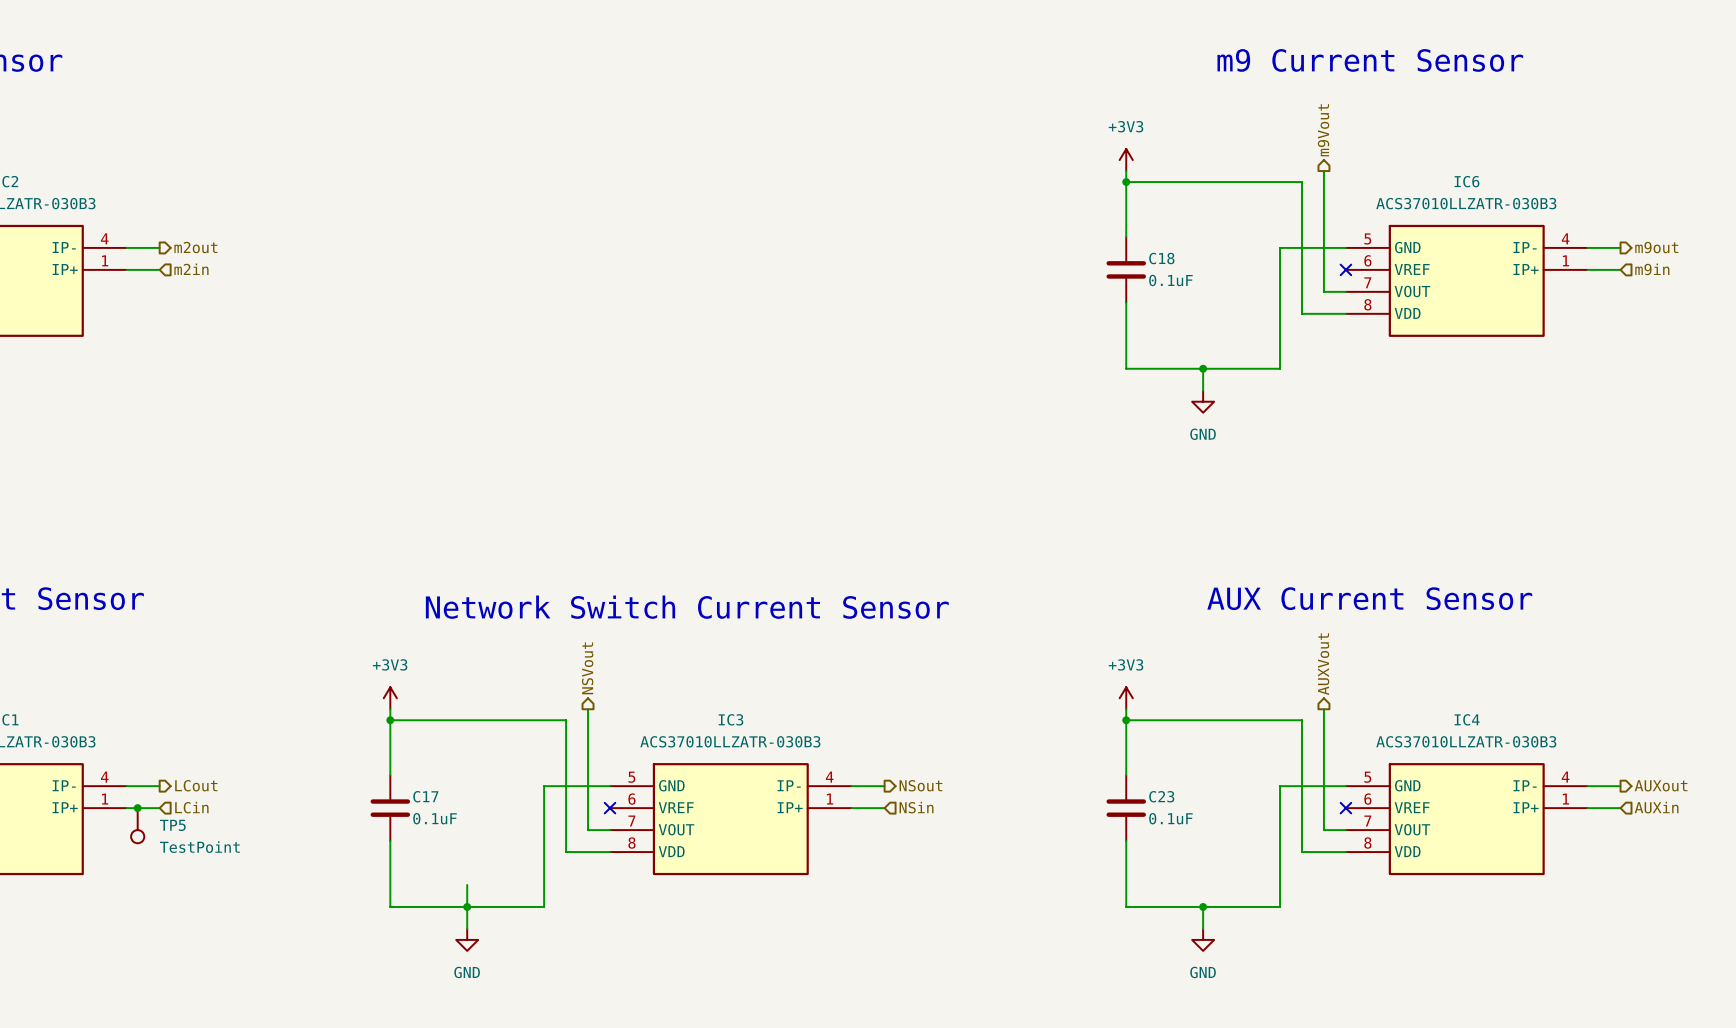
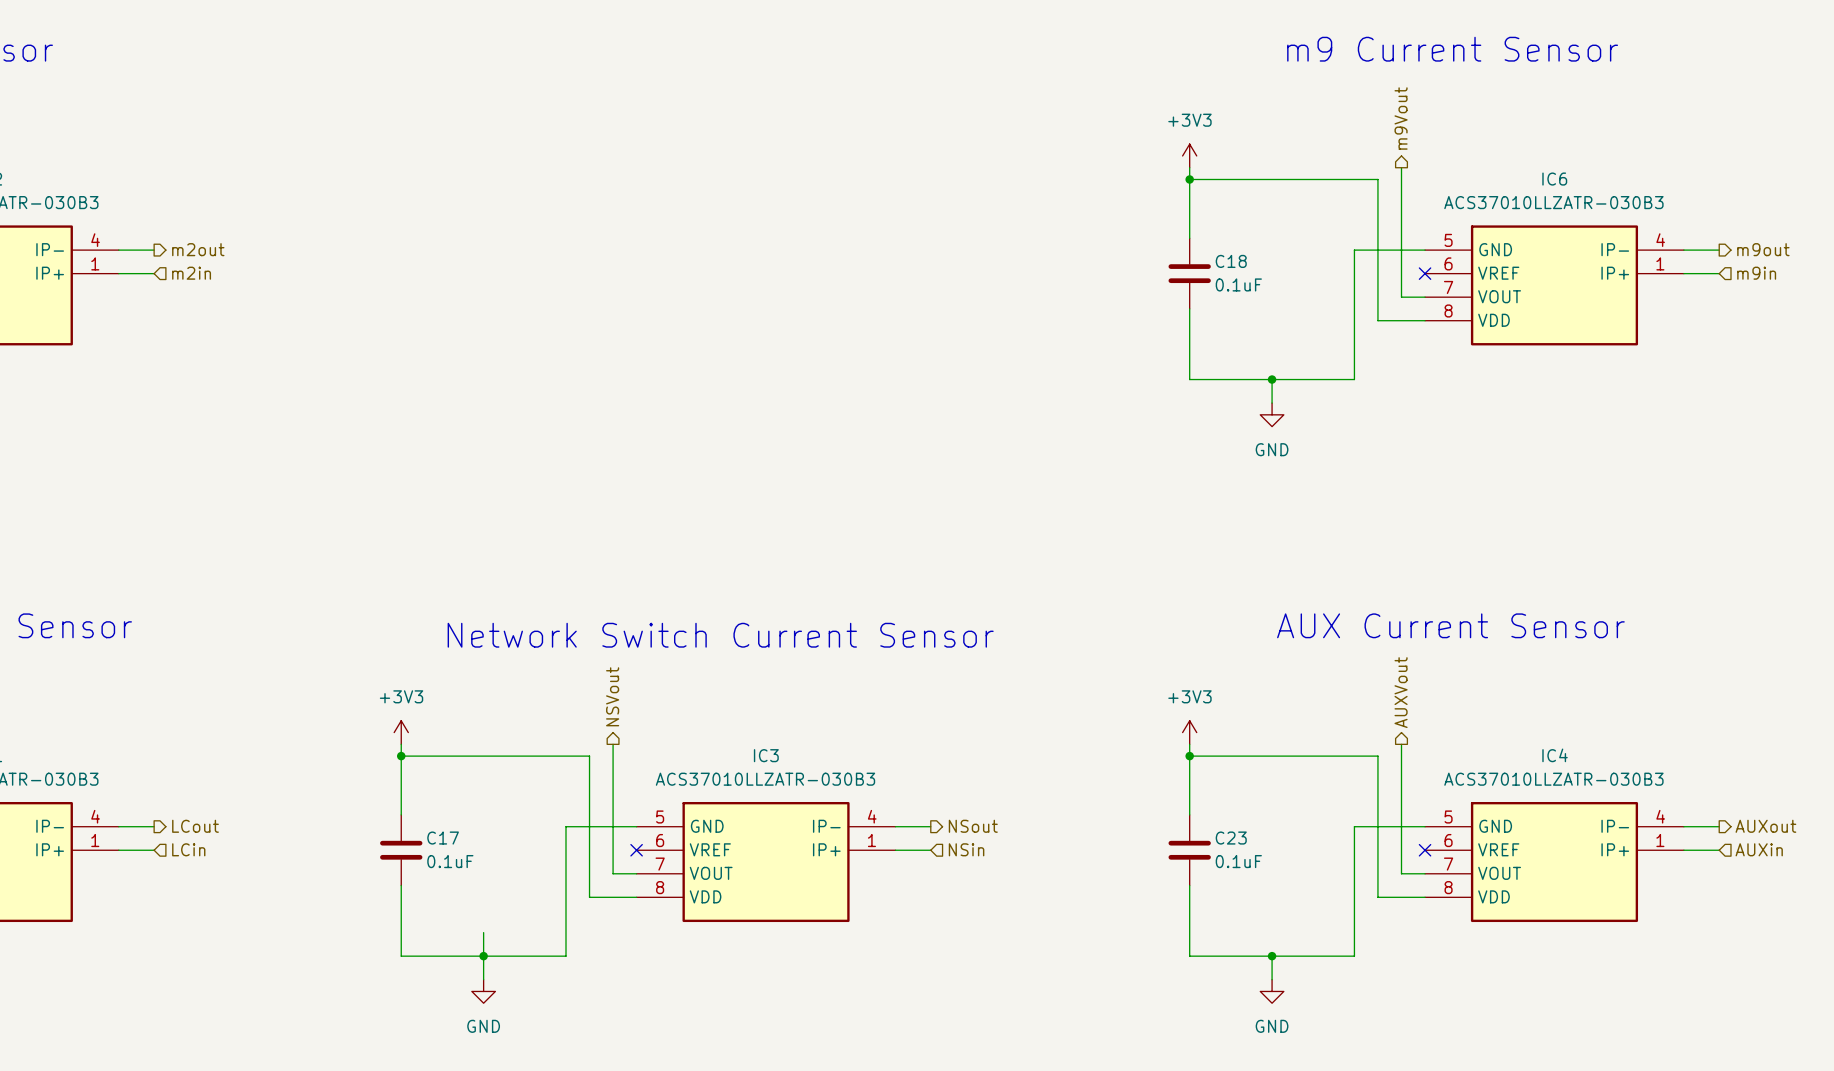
junction: (137, 808) -> none
TP5: TestPoint (137, 825) -> none

